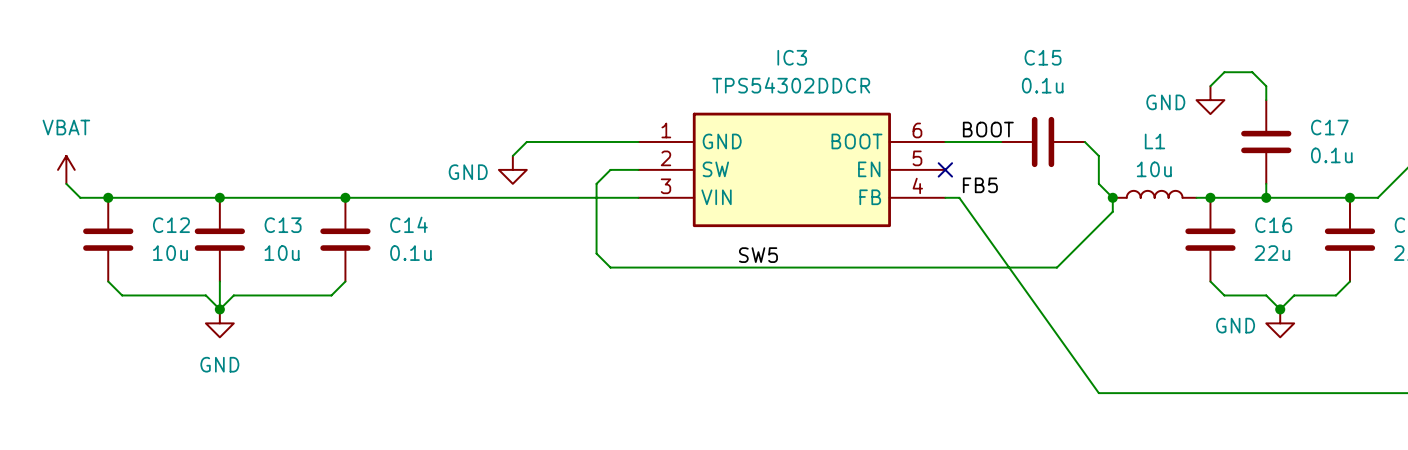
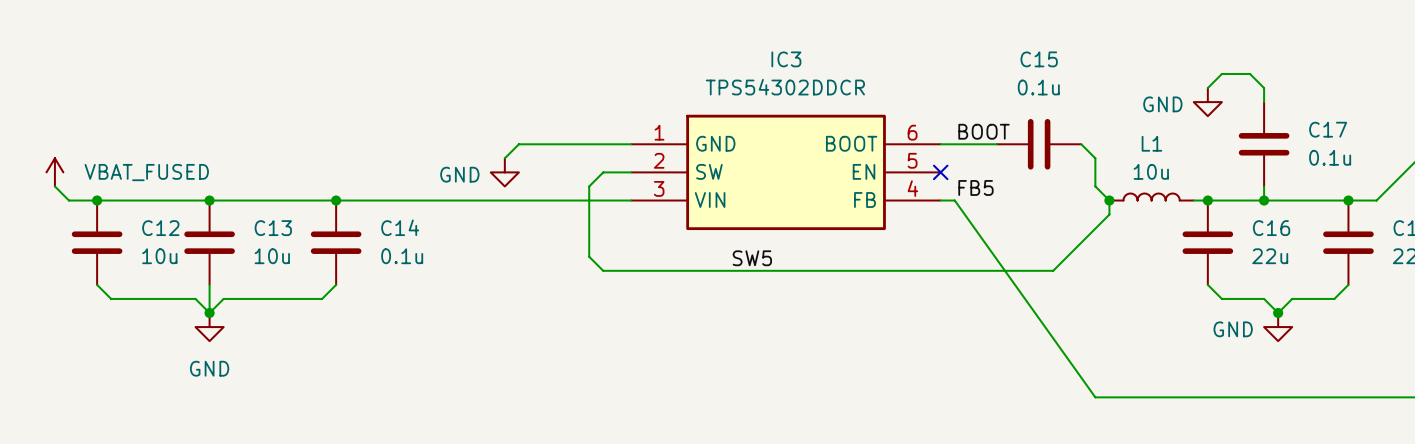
power symbol: VBAT (66, 169) -> VBAT_FUSED (54, 172)

